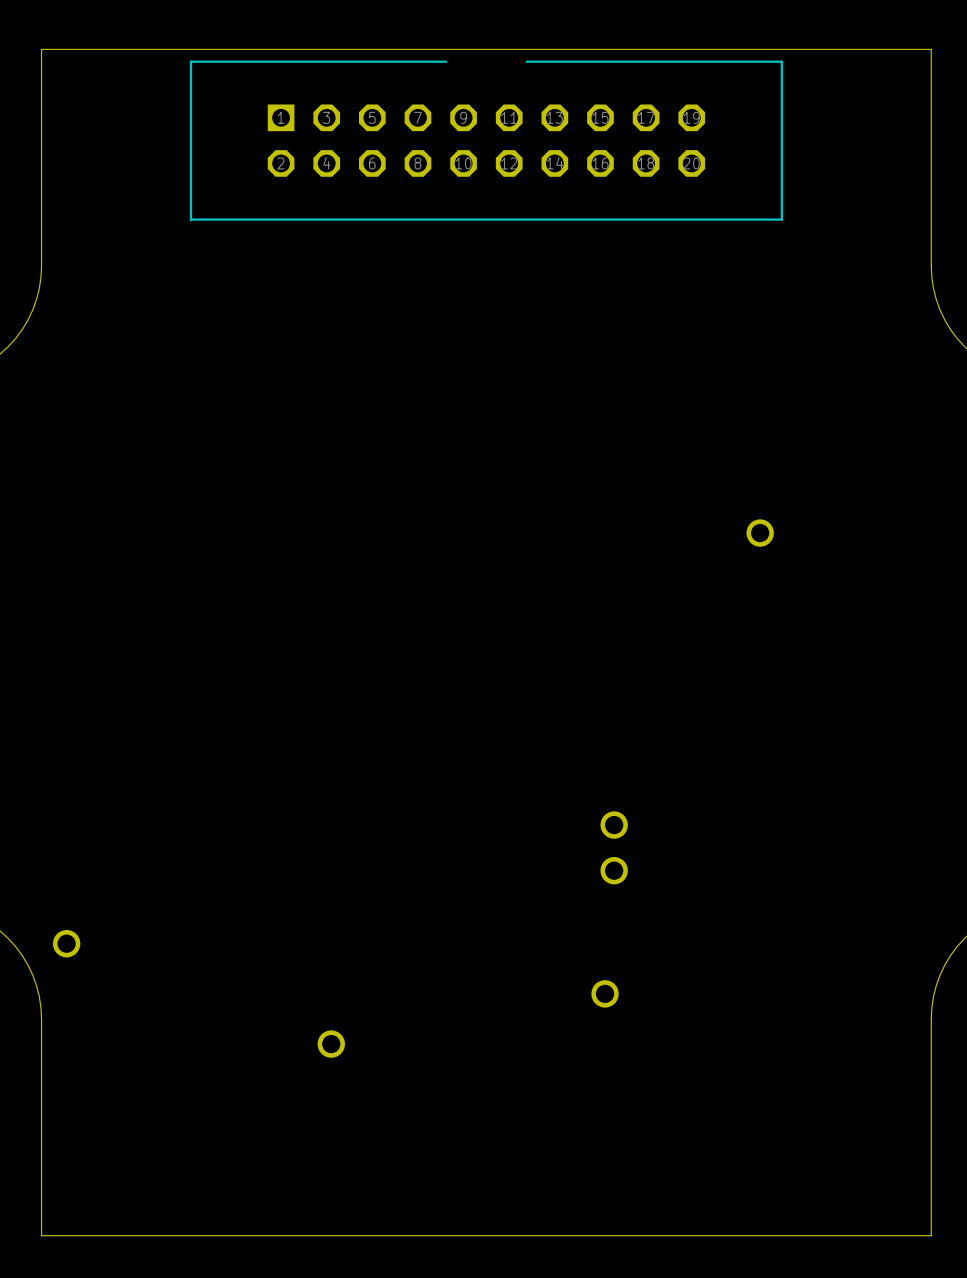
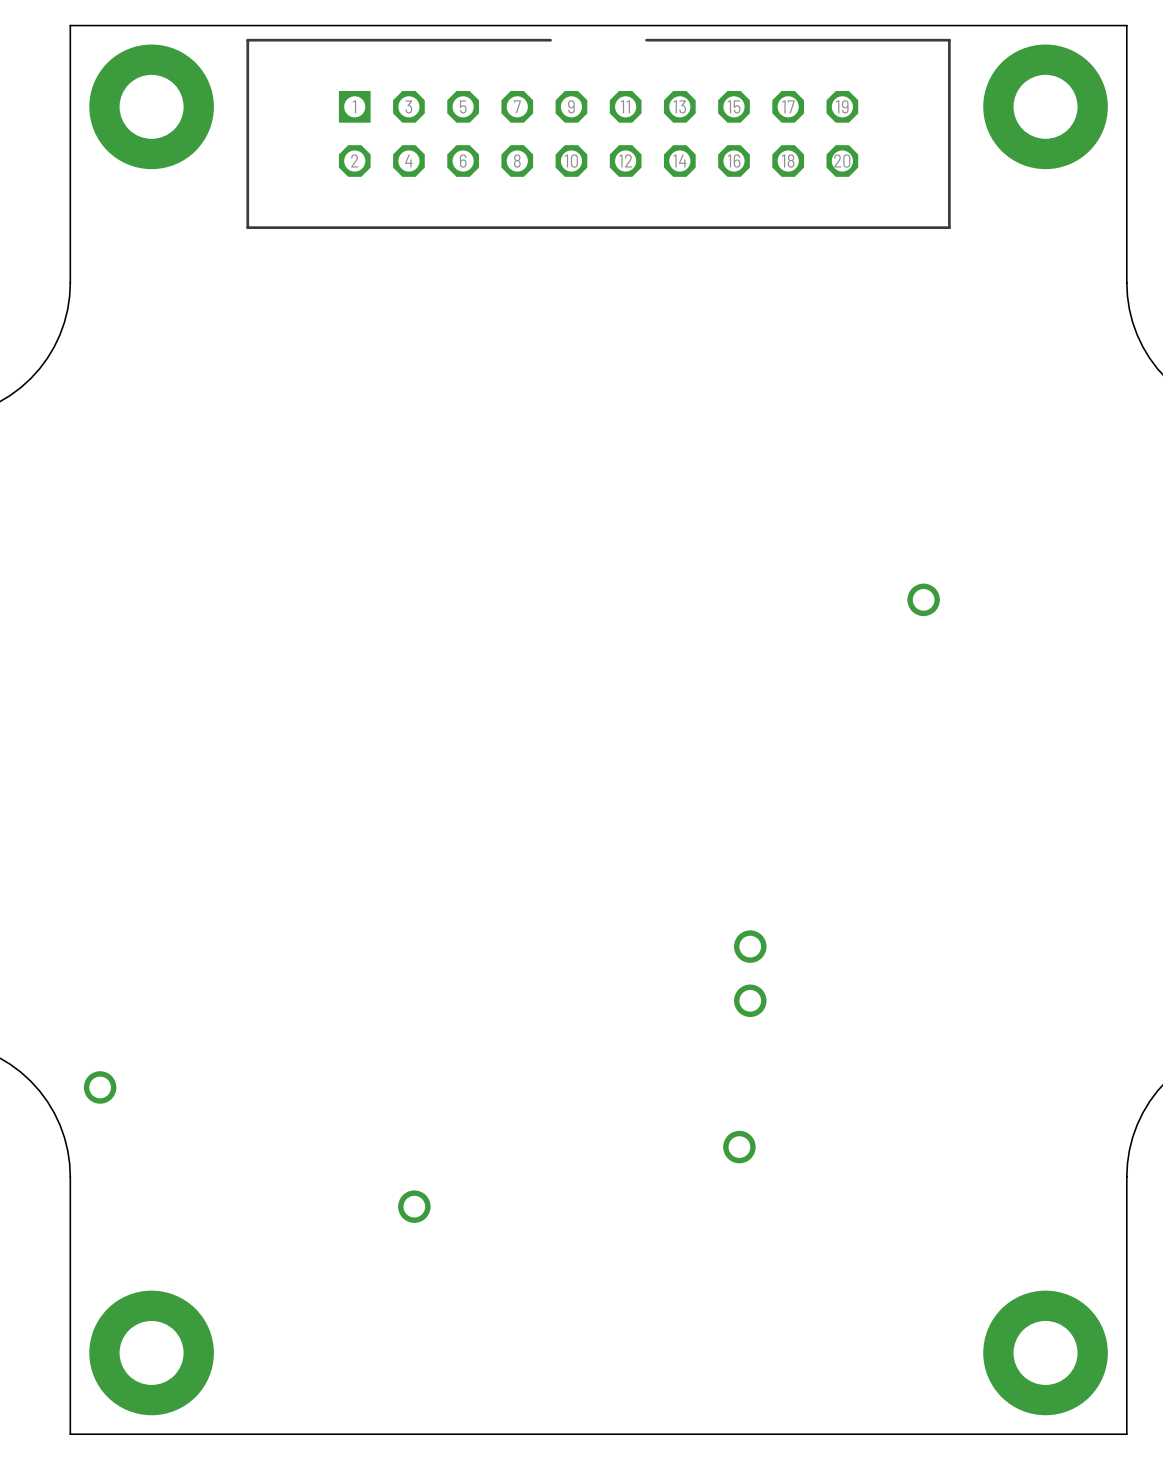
part: none -> (151, 106)
part: none -> (1045, 106)
part: none -> (151, 1352)
part: none -> (1045, 1352)

